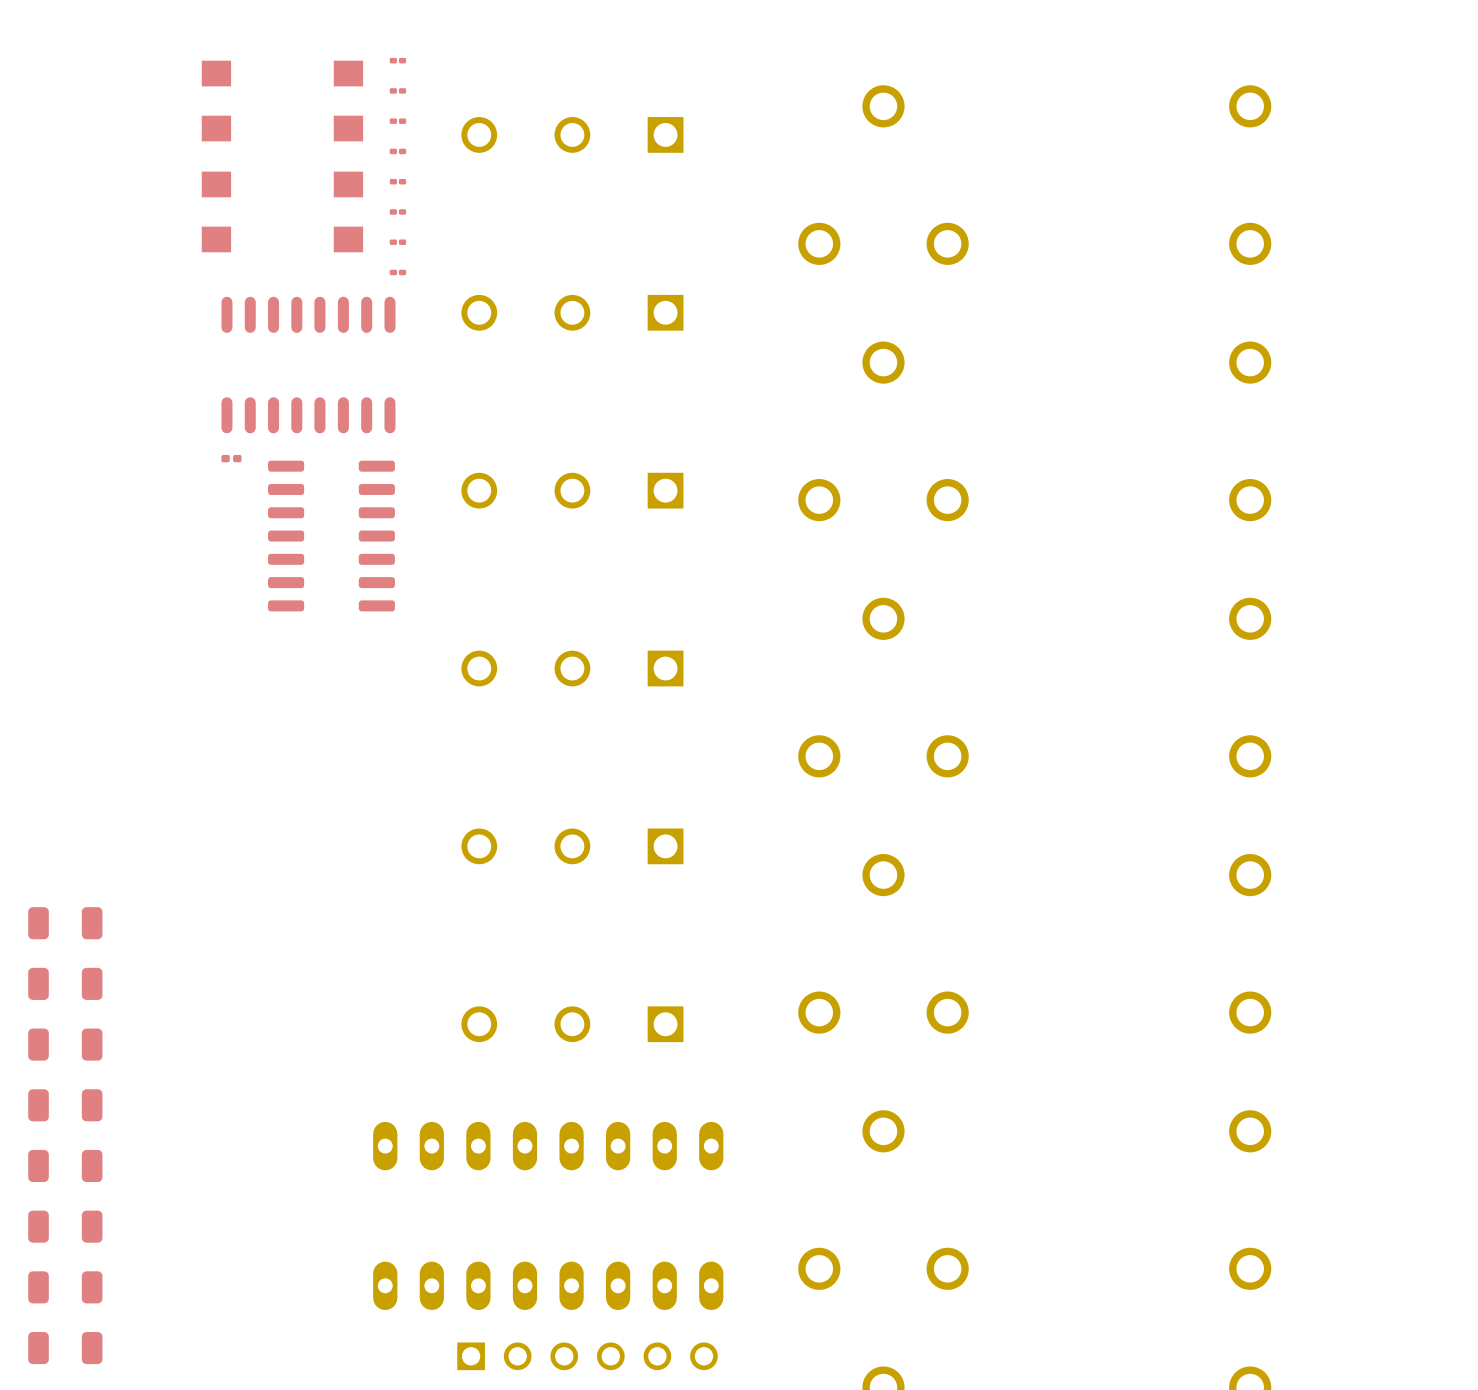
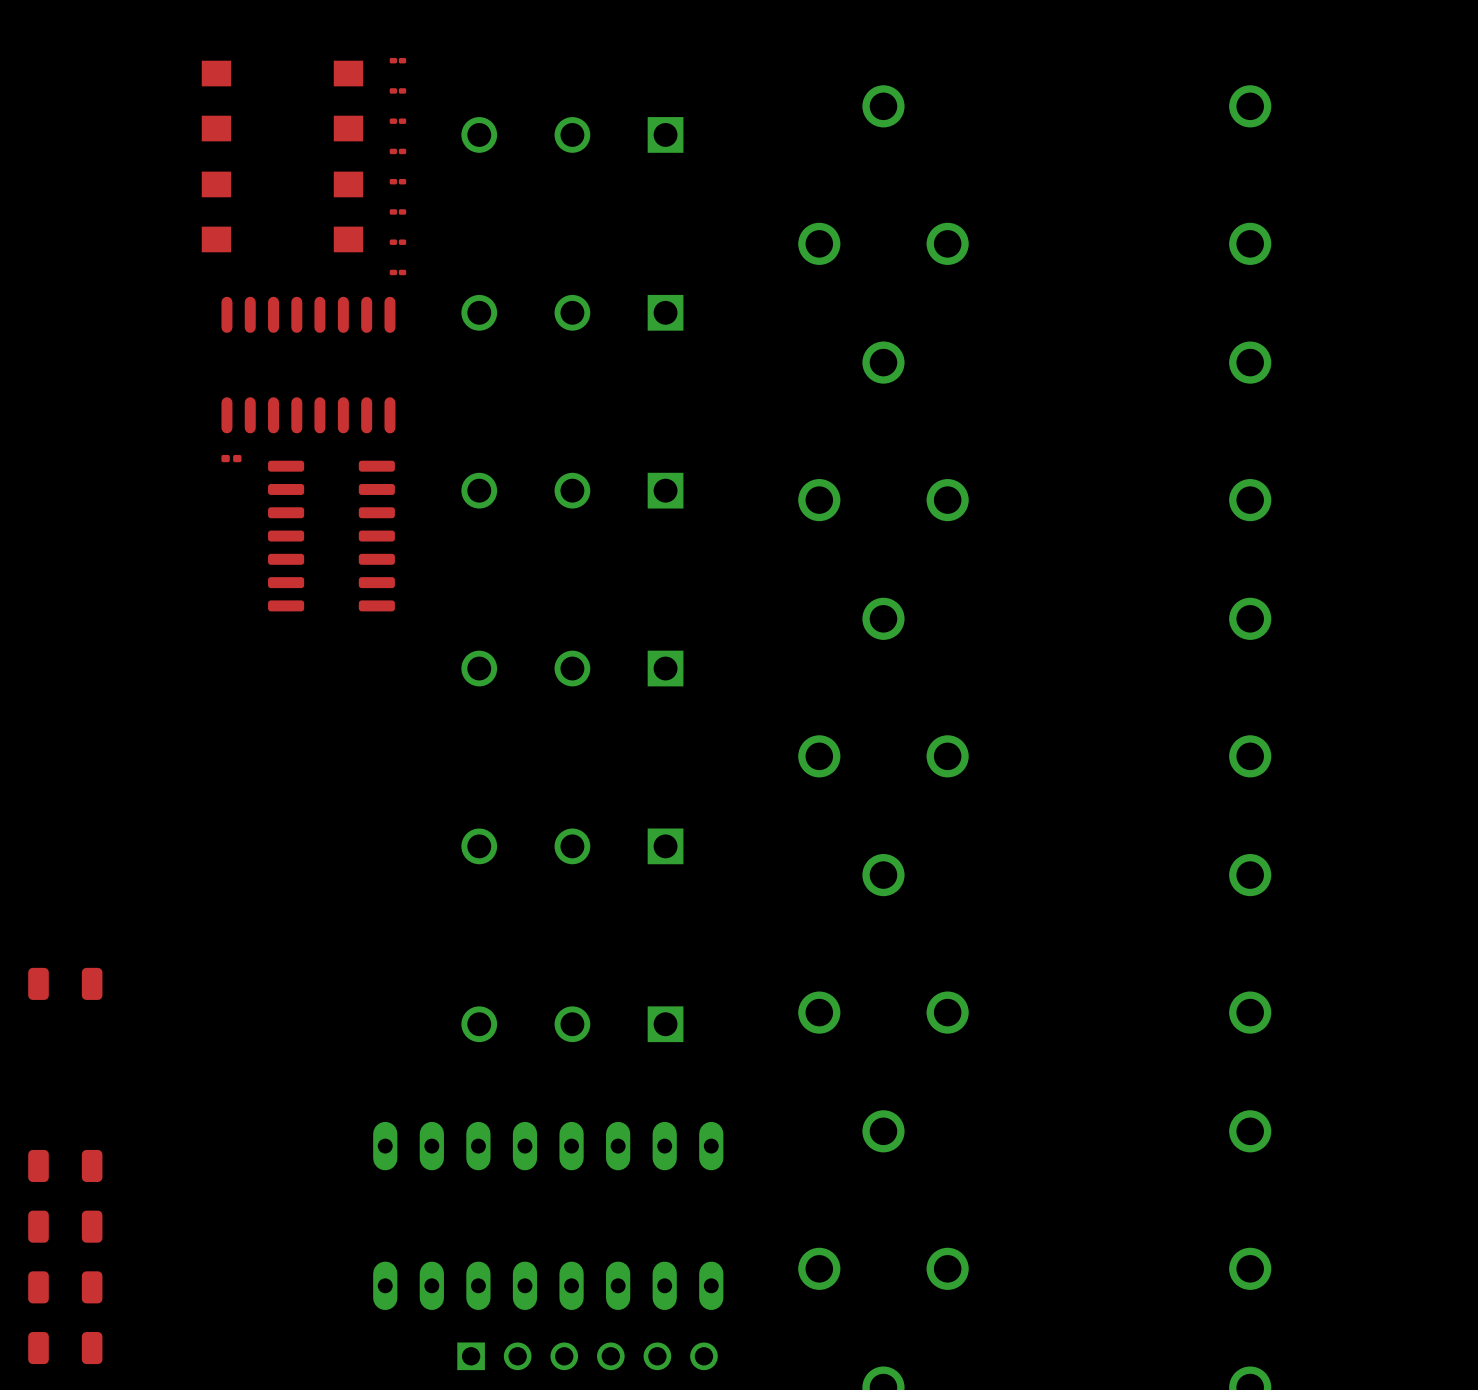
part: (65, 923) -> none
part: (65, 1044) -> none
part: (65, 1105) -> none

